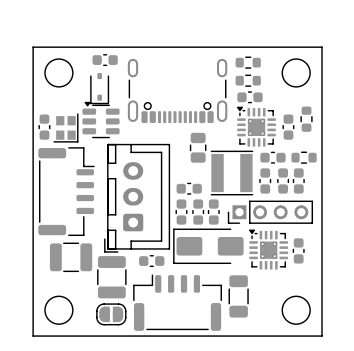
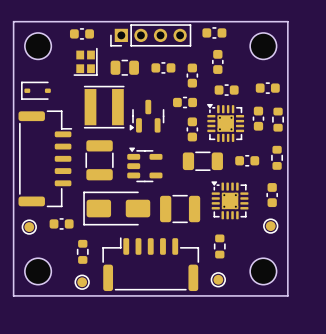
part footprint: [235, 56, 261, 69] -> [202, 27, 227, 39]
part footprint: [90, 72, 110, 105] -> [73, 48, 98, 76]
part: (248, 80) -> none
part: (177, 90) -> none
part: none -> (163, 67)
part rotation: 0° (249, 97) -> 90° clockwise (217, 61)
part: none -> (192, 75)
part footprint: [236, 106, 276, 147] -> [214, 84, 239, 96]
part footprint: [300, 106, 313, 132] -> [255, 82, 280, 94]
part: none -> (36, 90)
part: (101, 120) -> none
part: (44, 127) -> none
part: (65, 127) -> none
part: (288, 127) -> none
part: none -> (185, 102)
part: none -> (146, 116)
part footprint: [38, 147, 95, 236] -> [18, 110, 72, 208]
part rotation: 0° (198, 147) -> 90° clockwise (124, 67)
part position: (198, 147) -> (124, 67)
part: none -> (258, 118)
part: none -> (225, 122)
part: (272, 157) -> none
part rotation: 0° (304, 157) -> 90° clockwise (278, 119)
part: none -> (192, 129)
part position: (231, 173) -> (104, 107)
part: (265, 180) -> none
part: (283, 180) -> none
part: (298, 180) -> none
part: (189, 188) -> none
part: none -> (277, 157)
part: none -> (99, 160)
part: none -> (247, 160)
part: none -> (144, 164)
part: (137, 198) -> none
part: (181, 212) -> none
part: (198, 212) -> none
part: (213, 212) -> none
part position: (270, 212) -> (150, 35)
part footprint: [173, 228, 244, 264] -> [160, 195, 201, 223]
part: none -> (116, 208)
part position: (268, 249) -> (229, 200)
part position: (298, 250) -> (272, 195)
part: (71, 257) -> none
part: none -> (61, 223)
part: (151, 261) -> none
part: none -> (270, 226)
part: none -> (29, 227)
part footprint: [133, 274, 222, 331] -> [102, 237, 199, 292]
part: (111, 277) -> none
part: none -> (219, 246)
part: none -> (82, 251)
part rotation: 0° (238, 296) -> 90° clockwise (202, 161)
part position: (238, 296) -> (202, 161)
part footprint: [96, 303, 127, 326] -> [74, 274, 90, 290]
part: none -> (218, 279)

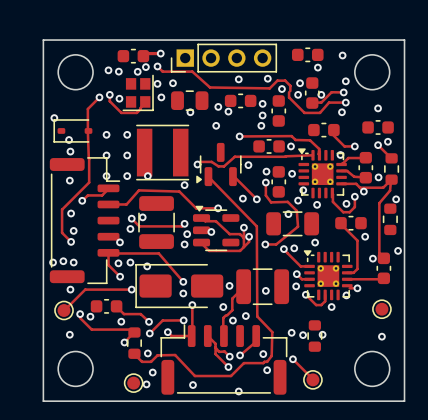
track: none -> (148, 53) (160, 53)
via: none -> (160, 53)
via: none -> (342, 55)
track: none -> (157, 66) (162, 71) (192, 71) (210, 87) (269, 88) (277, 80) (285, 80) (290, 85) (290, 90)
via: none -> (157, 66)
via: none -> (145, 67)
via: none -> (317, 67)
via: none -> (108, 70)
via: none -> (118, 71)
via: none -> (137, 71)
via: none -> (238, 79)
via: none -> (267, 78)
via: none -> (345, 81)
via: none -> (157, 83)
via: none -> (172, 83)
via: none -> (300, 83)
via: none -> (281, 89)
track: none -> (289, 92) (289, 97) (304, 112) (320, 112) (329, 102) (345, 102)
track: none -> (343, 92) (331, 92) (321, 102) (312, 102)
via: none -> (343, 92)
track: none -> (109, 94) (109, 101) (121, 112) (136, 112) (145, 101)
via: none -> (109, 94)
via: none -> (298, 94)
via: none -> (321, 94)
track: none -> (99, 97) (87, 109) (89, 182) (62, 209) (62, 232) (71, 241)
via: none -> (99, 97)
via: none -> (161, 97)
via: none -> (119, 98)
via: none -> (345, 102)
via: none -> (262, 103)
via: none -> (218, 106)
via: none -> (378, 108)
via: none -> (190, 112)
via: none -> (228, 111)
via: none -> (341, 112)
via: none -> (262, 115)
via: none -> (54, 118)
via: none -> (216, 125)
via: none -> (261, 125)
track: none -> (331, 133) (344, 146) (354, 146)
via: none -> (106, 134)
via: none -> (127, 134)
track: none -> (239, 136) (291, 136) (295, 139) (310, 140) (319, 149) (319, 155)
via: none -> (239, 136)
via: none -> (69, 139)
via: none -> (387, 141)
track: none -> (378, 145) (391, 158)
via: none -> (378, 145)
via: none -> (291, 146)
via: none -> (354, 146)
via: none -> (70, 151)
via: none -> (340, 154)
via: none -> (106, 155)
via: none -> (127, 155)
track: none -> (313, 155) (234, 156) (223, 166) (218, 166) (211, 161) (200, 161) (197, 164)
track: none -> (365, 157) (348, 158) (341, 164)
via: none -> (197, 164)
via: none -> (248, 165)
via: none -> (266, 171)
track: none -> (341, 170) (347, 170) (354, 176) (365, 177)
via: none -> (292, 173)
via: none -> (106, 176)
via: none -> (127, 176)
via: none -> (147, 176)
track: none -> (208, 176) (256, 226) (257, 316) (272, 332) (271, 356) (267, 361) (263, 363) (243, 363) (231, 376) (194, 376) (175, 355) (157, 355) (151, 361) (142, 361) (134, 353)
track: none -> (232, 176) (256, 199)
via: none -> (378, 177)
via: none -> (69, 180)
track: none -> (389, 181) (383, 187) (360, 187)
track: none -> (390, 181) (390, 190) (379, 203) (379, 253) (383, 257)
track: none -> (265, 182) (265, 195) (271, 202) (287, 201) (296, 210) (298, 226) (276, 244) (265, 244)
via: none -> (265, 182)
track: none -> (341, 183) (356, 183) (363, 191)
via: none -> (184, 185)
track: none -> (108, 188) (102, 195) (87, 195) (82, 200)
via: none -> (303, 190)
via: none -> (363, 191)
track: none -> (332, 193) (332, 201) (343, 212) (349, 212) (354, 207) (354, 196)
via: none -> (354, 196)
via: none -> (242, 198)
via: none -> (256, 199)
via: none -> (396, 199)
via: none -> (82, 200)
via: none -> (298, 200)
track: none -> (108, 204) (126, 204) (138, 190) (179, 191) (196, 208) (218, 208)
via: none -> (317, 204)
via: none -> (346, 203)
via: none -> (218, 208)
via: none -> (71, 213)
via: none -> (288, 214)
via: none -> (142, 217)
track: none -> (202, 218) (205, 221) (215, 221) (229, 234) (240, 234) (243, 238)
track: none -> (131, 218) (139, 226) (182, 226) (184, 223)
via: none -> (131, 218)
track: none -> (340, 223) (357, 240) (357, 268) (353, 272) (347, 272)
via: none -> (184, 223)
track: none -> (243, 227) (243, 247)
via: none -> (243, 227)
via: none -> (130, 228)
via: none -> (73, 230)
via: none -> (211, 231)
via: none -> (187, 234)
track: none -> (249, 236) (249, 241) (240, 250) (209, 250) (202, 244)
via: none -> (249, 236)
via: none -> (365, 236)
via: none -> (71, 241)
via: none -> (119, 242)
via: none -> (315, 242)
via: none -> (184, 244)
via: none -> (265, 244)
via: none -> (294, 248)
track: none -> (283, 249) (300, 266) (309, 266)
via: none -> (283, 249)
via: none -> (398, 250)
via: none -> (372, 258)
via: none -> (63, 261)
via: none -> (53, 262)
via: none -> (73, 262)
via: none -> (130, 262)
via: none -> (118, 263)
via: none -> (147, 266)
track: none -> (296, 274) (301, 279) (309, 279)
via: none -> (296, 274)
track: none -> (120, 276) (108, 265) (108, 252) (158, 253) (183, 281)
via: none -> (120, 276)
track: none -> (383, 278) (347, 279)
via: none -> (183, 281)
via: none -> (229, 285)
via: none -> (296, 286)
track: none -> (243, 287) (232, 298) (232, 310) (227, 315)
track: none -> (349, 288) (357, 288)
via: none -> (357, 288)
via: none -> (70, 289)
track: none -> (131, 289) (85, 289) (64, 310)
via: none -> (131, 289)
via: none -> (265, 290)
via: none -> (183, 293)
track: none -> (305, 294) (316, 305) (321, 305) (325, 301) (325, 294)
via: none -> (305, 294)
via: none -> (346, 295)
track: none -> (192, 305) (192, 335) (171, 336) (167, 332)
via: none -> (192, 305)
track: none -> (116, 306) (123, 314) (140, 314) (149, 321)
via: none -> (223, 307)
via: none -> (331, 307)
track: none -> (80, 314) (80, 317) (91, 329) (131, 329) (134, 332) (124, 342)
via: none -> (80, 314)
track: none -> (225, 315) (223, 317) (223, 335)
via: none -> (90, 316)
via: none -> (245, 316)
track: none -> (183, 320) (162, 320) (149, 333)
via: none -> (183, 320)
via: none -> (232, 320)
via: none -> (121, 321)
via: none -> (149, 321)
via: none -> (167, 332)
via: none -> (149, 333)
via: none -> (291, 332)
via: none -> (69, 334)
via: none -> (303, 335)
via: none -> (322, 334)
track: none -> (207, 336) (215, 343) (215, 354) (228, 366)
track: none -> (256, 336) (256, 341) (240, 355)
via: none -> (381, 336)
via: none -> (124, 342)
track: none -> (215, 347) (219, 351) (224, 351) (229, 356)
via: none -> (147, 353)
via: none -> (263, 354)
via: none -> (240, 355)
via: none -> (229, 356)
track: none -> (292, 359) (312, 379)
via: none -> (292, 359)
via: none -> (228, 366)
via: none -> (267, 370)
via: none -> (152, 372)
via: none -> (146, 384)
via: none -> (192, 385)
via: none -> (238, 391)

